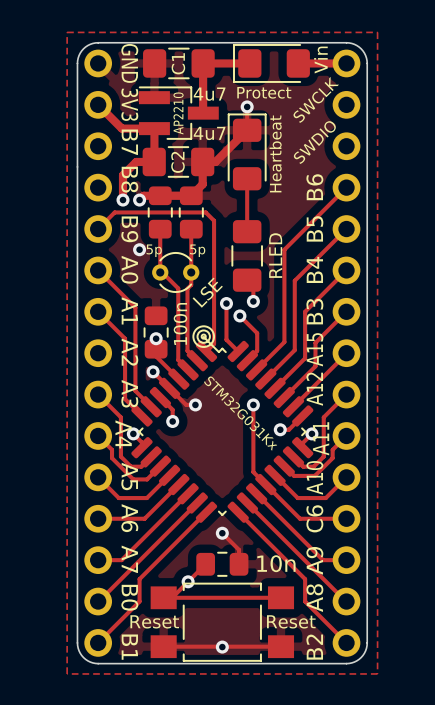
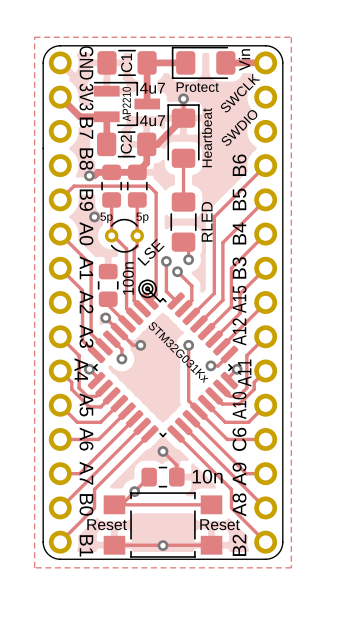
track: (154, 161) (136, 161) (123, 175) (123, 200) -> none
via: (123, 200) -> none
via: none -> (89, 175)
via: (139, 200) -> none
via: (156, 338) -> none

